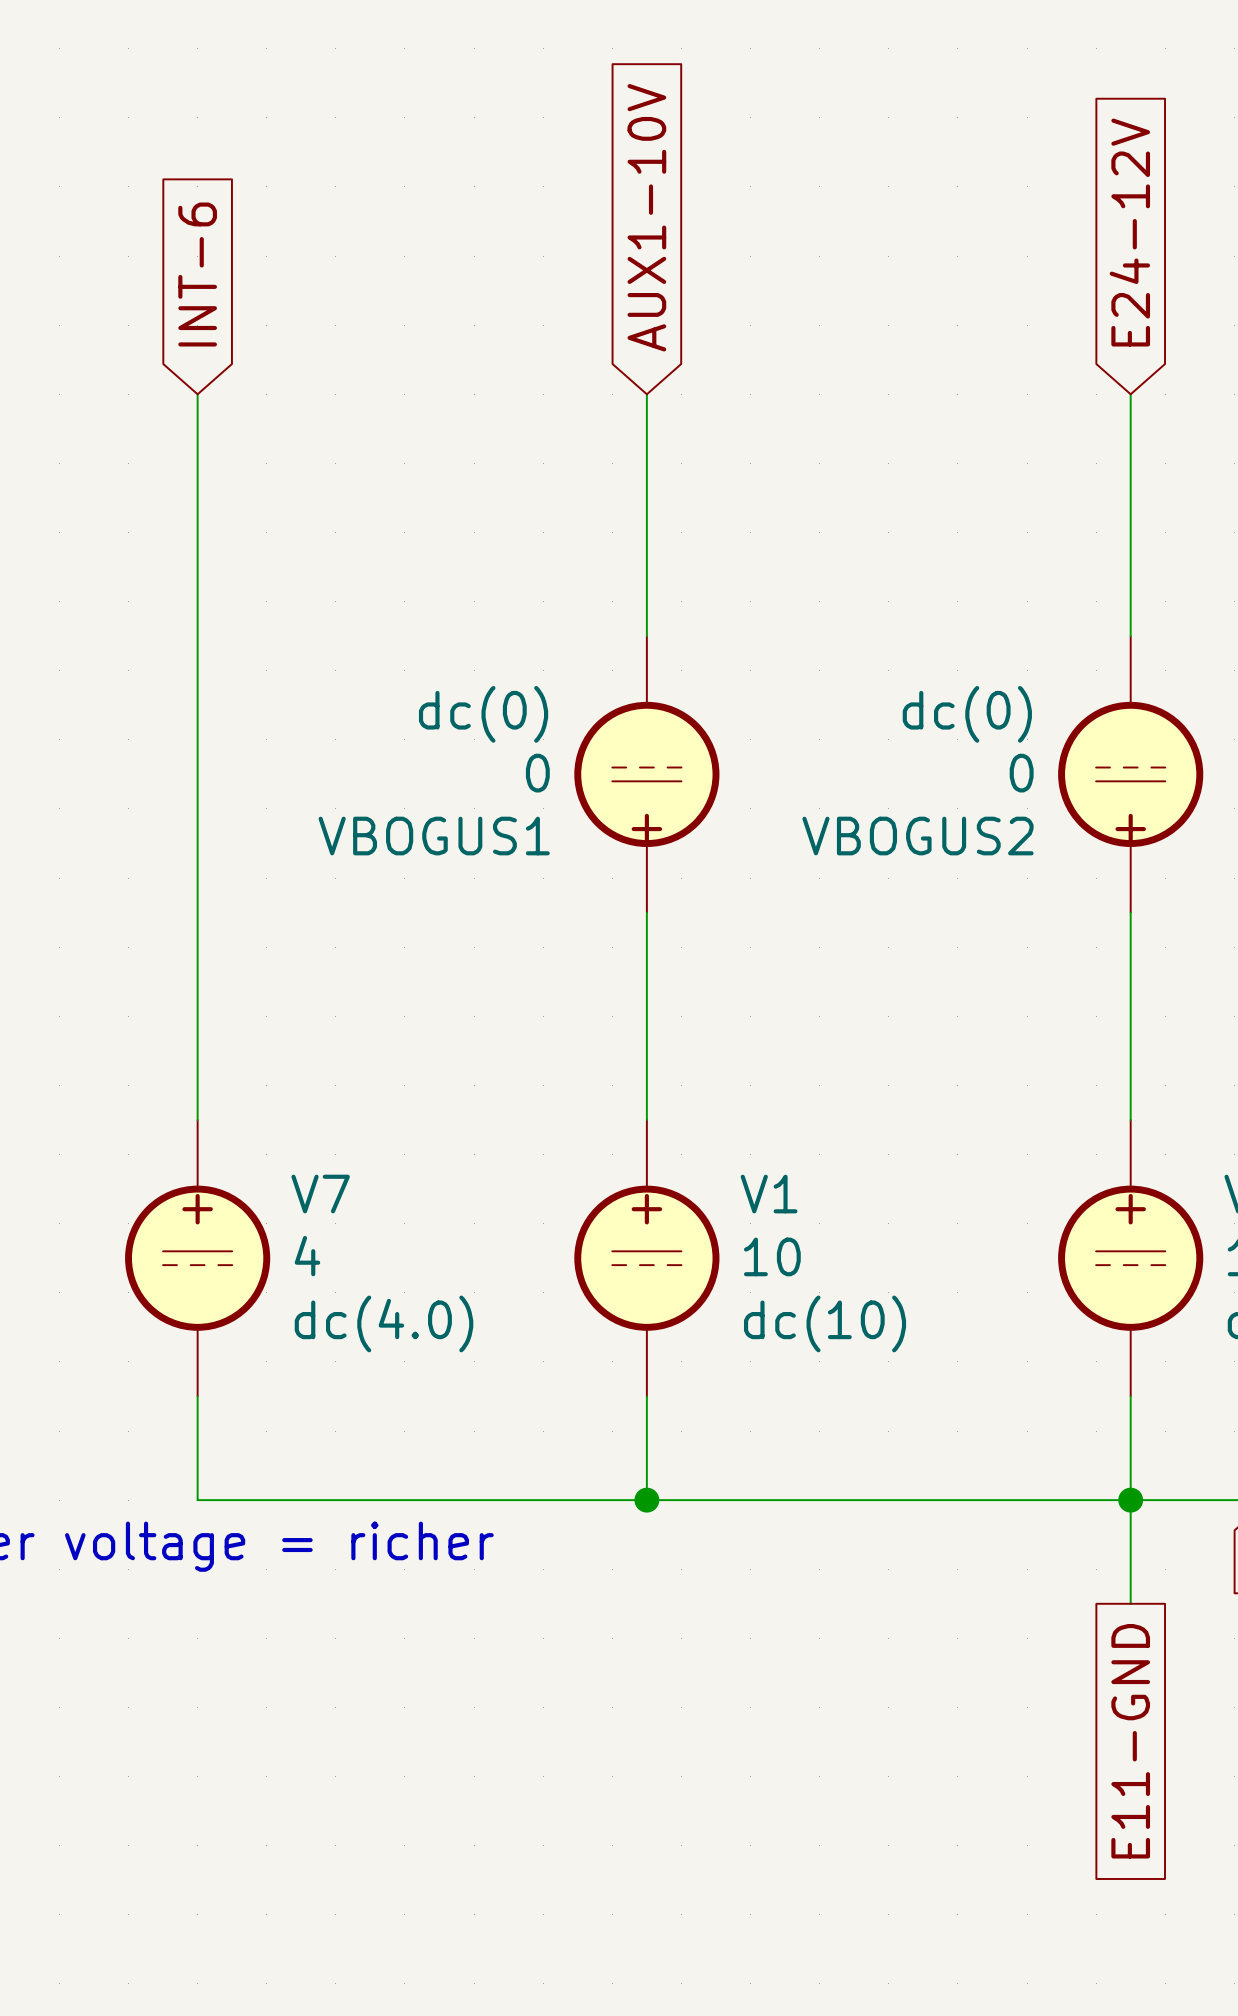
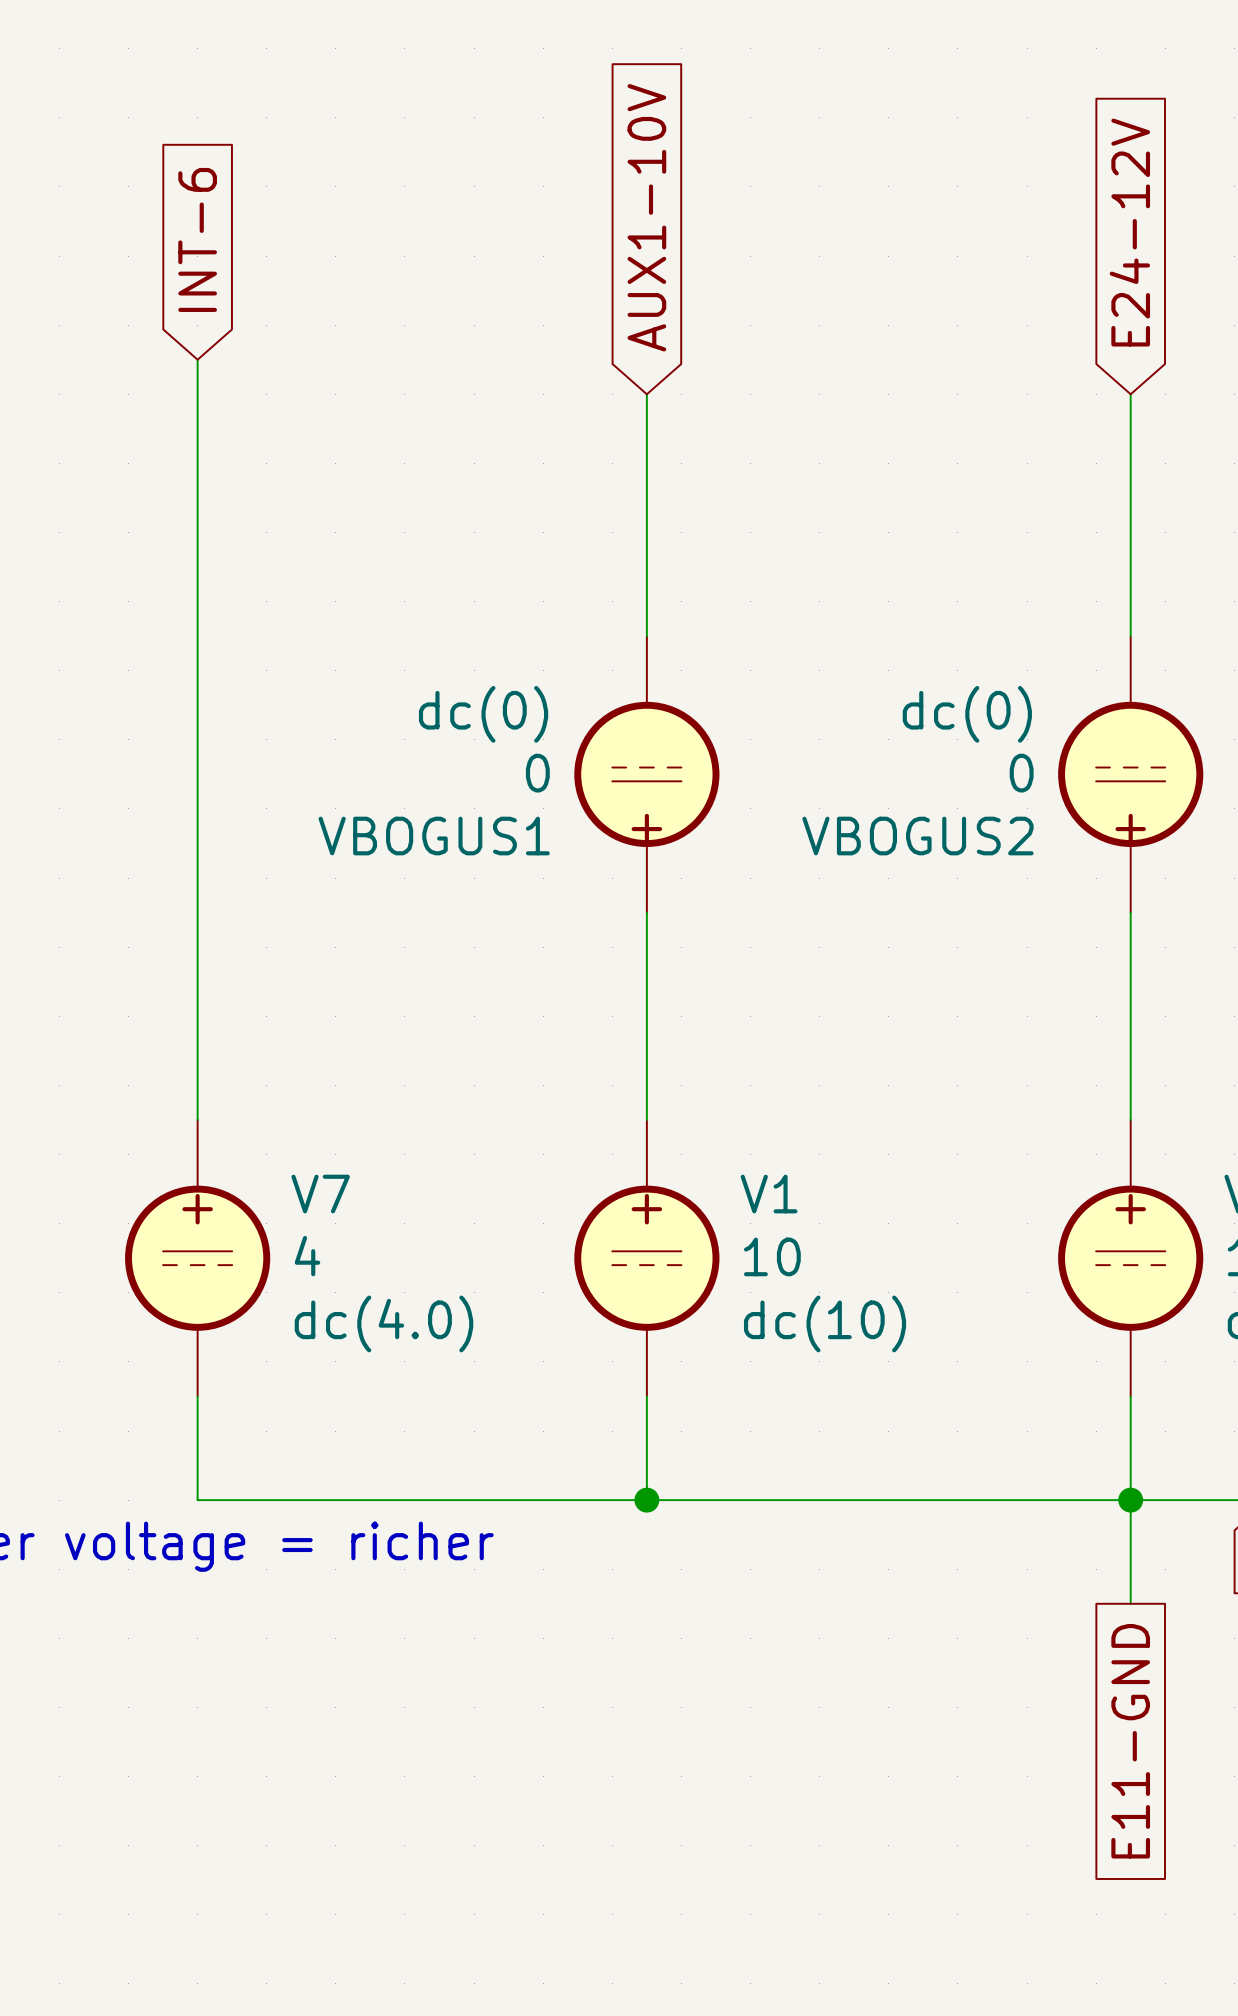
global label position: INT-6 (197, 274) -> INT-6 (197, 239)
wire: none -> (197, 359) (197, 394)

